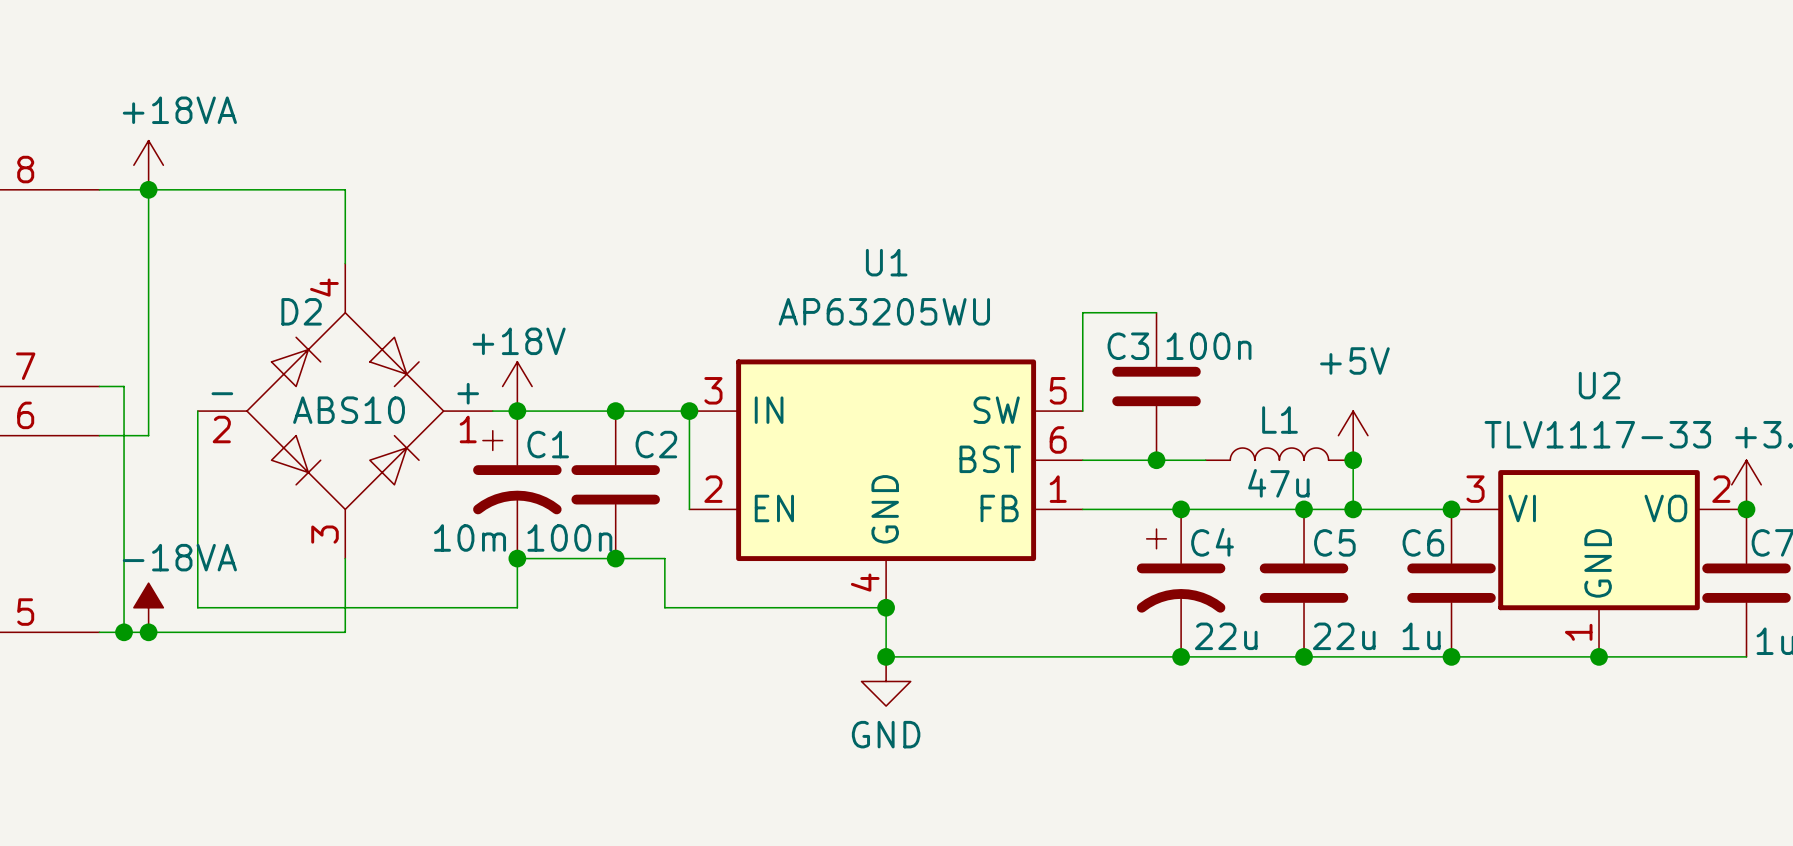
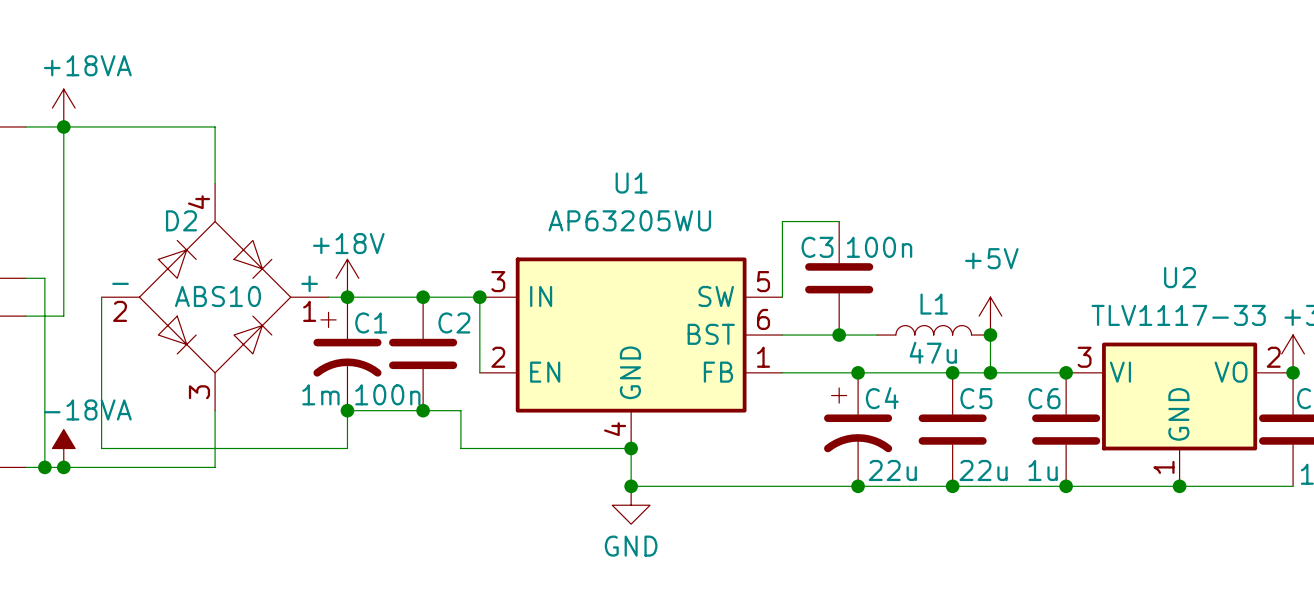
C1 value: 10m (470, 537) -> 1m (320, 394)

